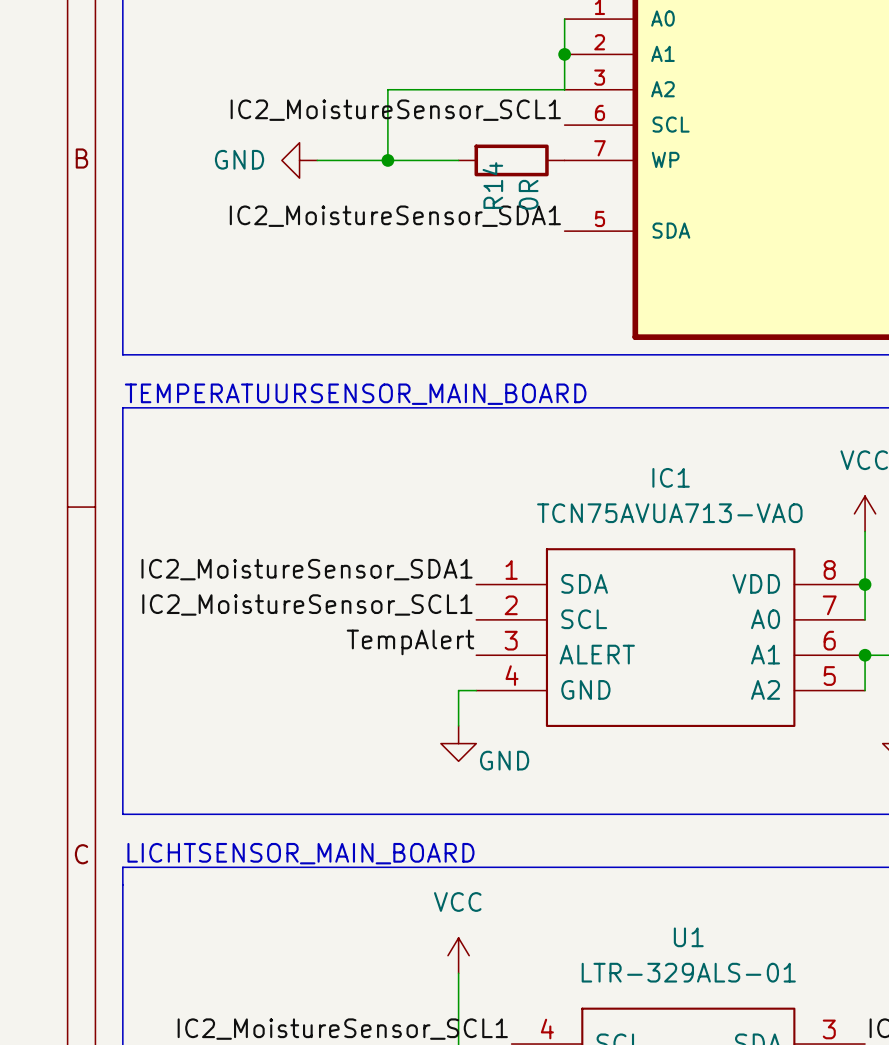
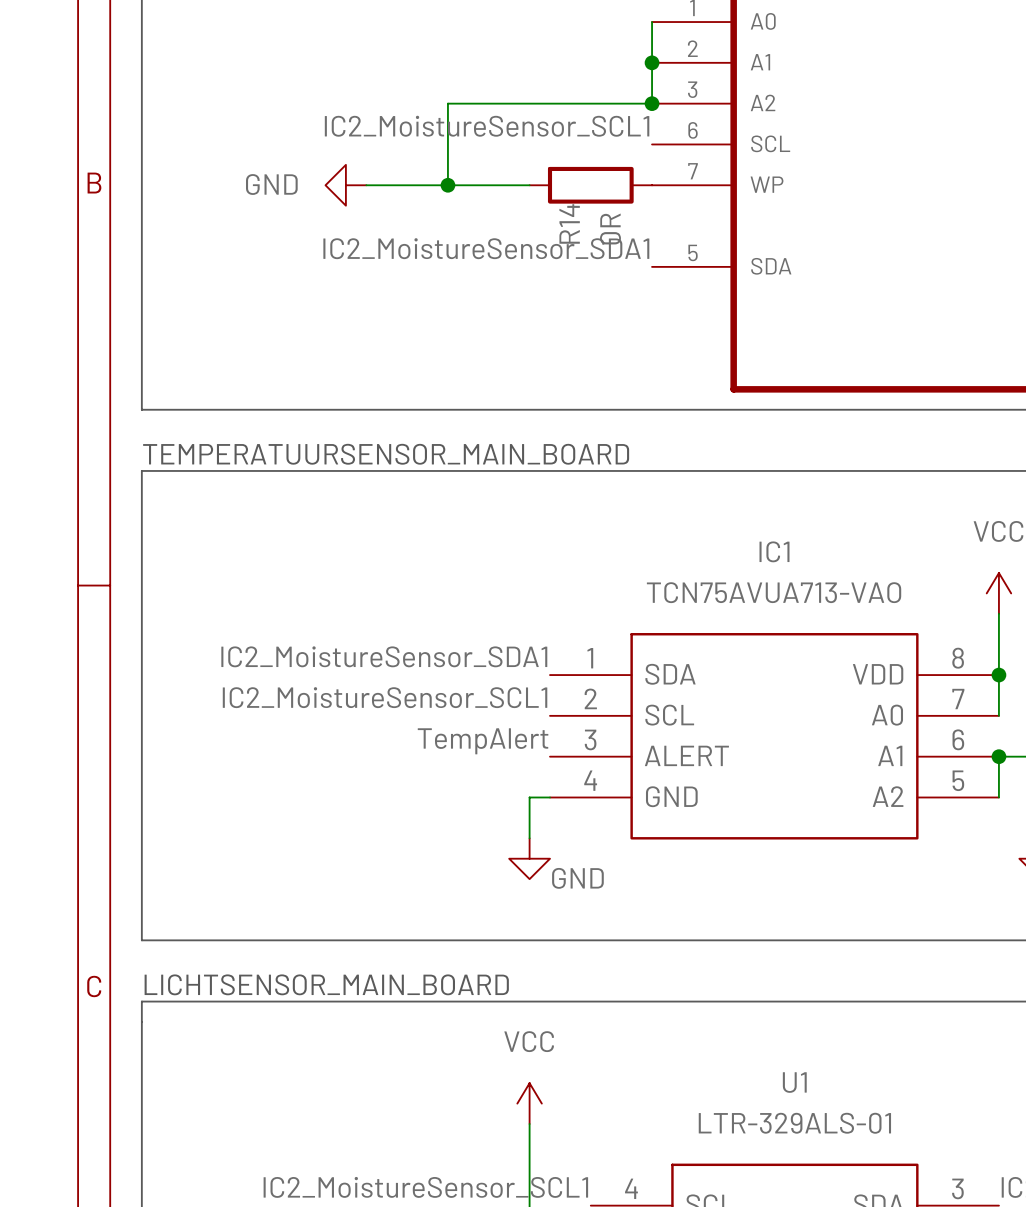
junction: none -> (652, 103)

